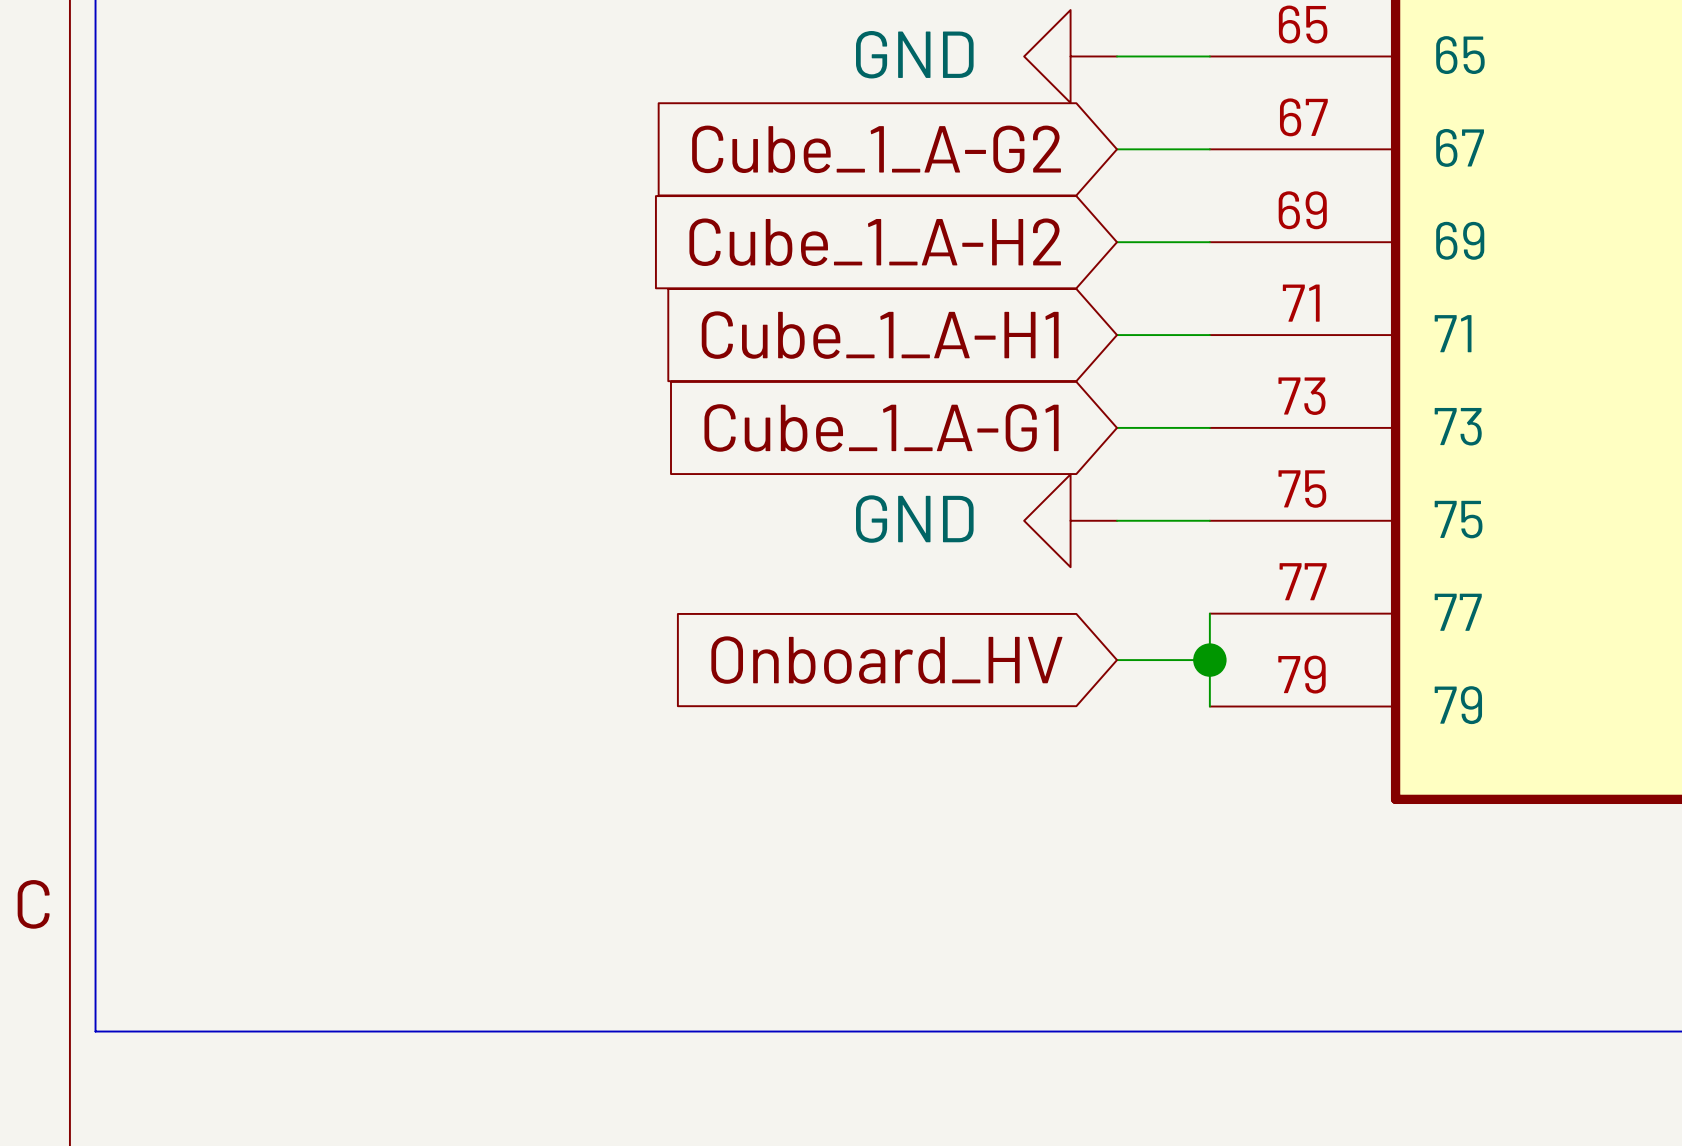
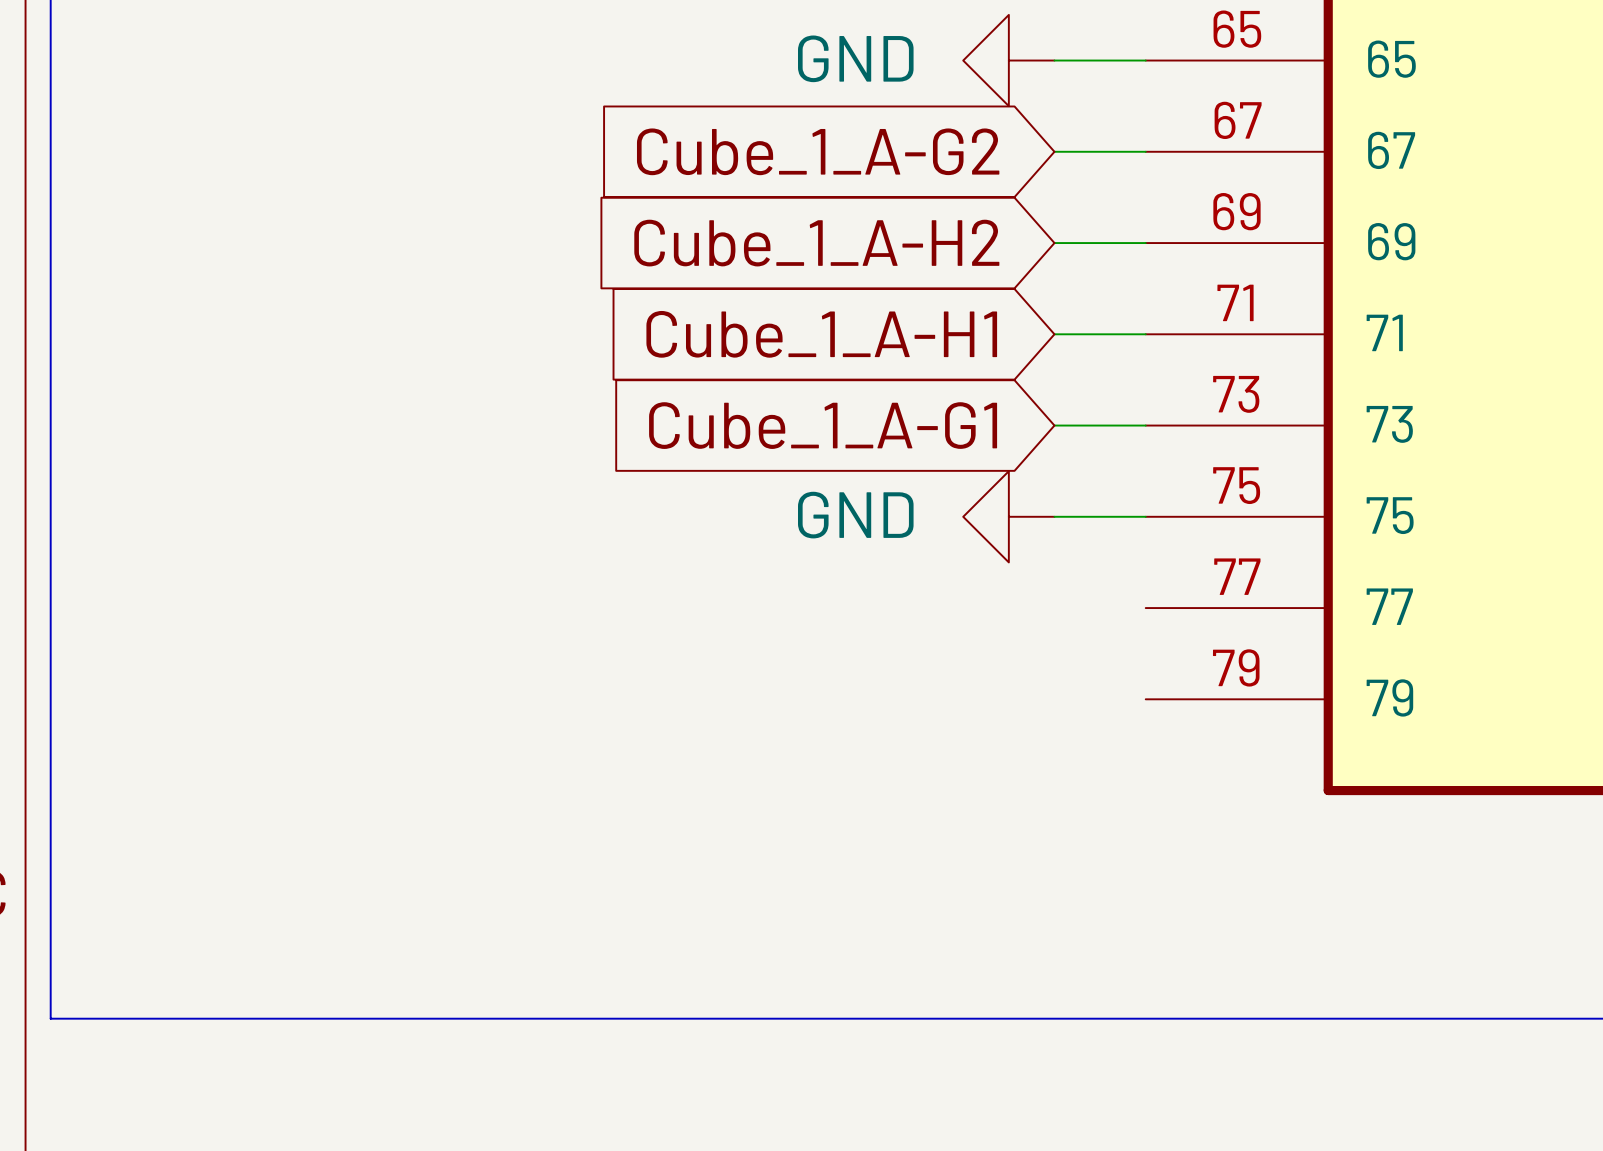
wire: (1209, 613) (1209, 706) -> none
global label: Onboard_HV (886, 660) -> none
wire: (1117, 660) (1209, 660) -> none
junction: (1209, 660) -> none

